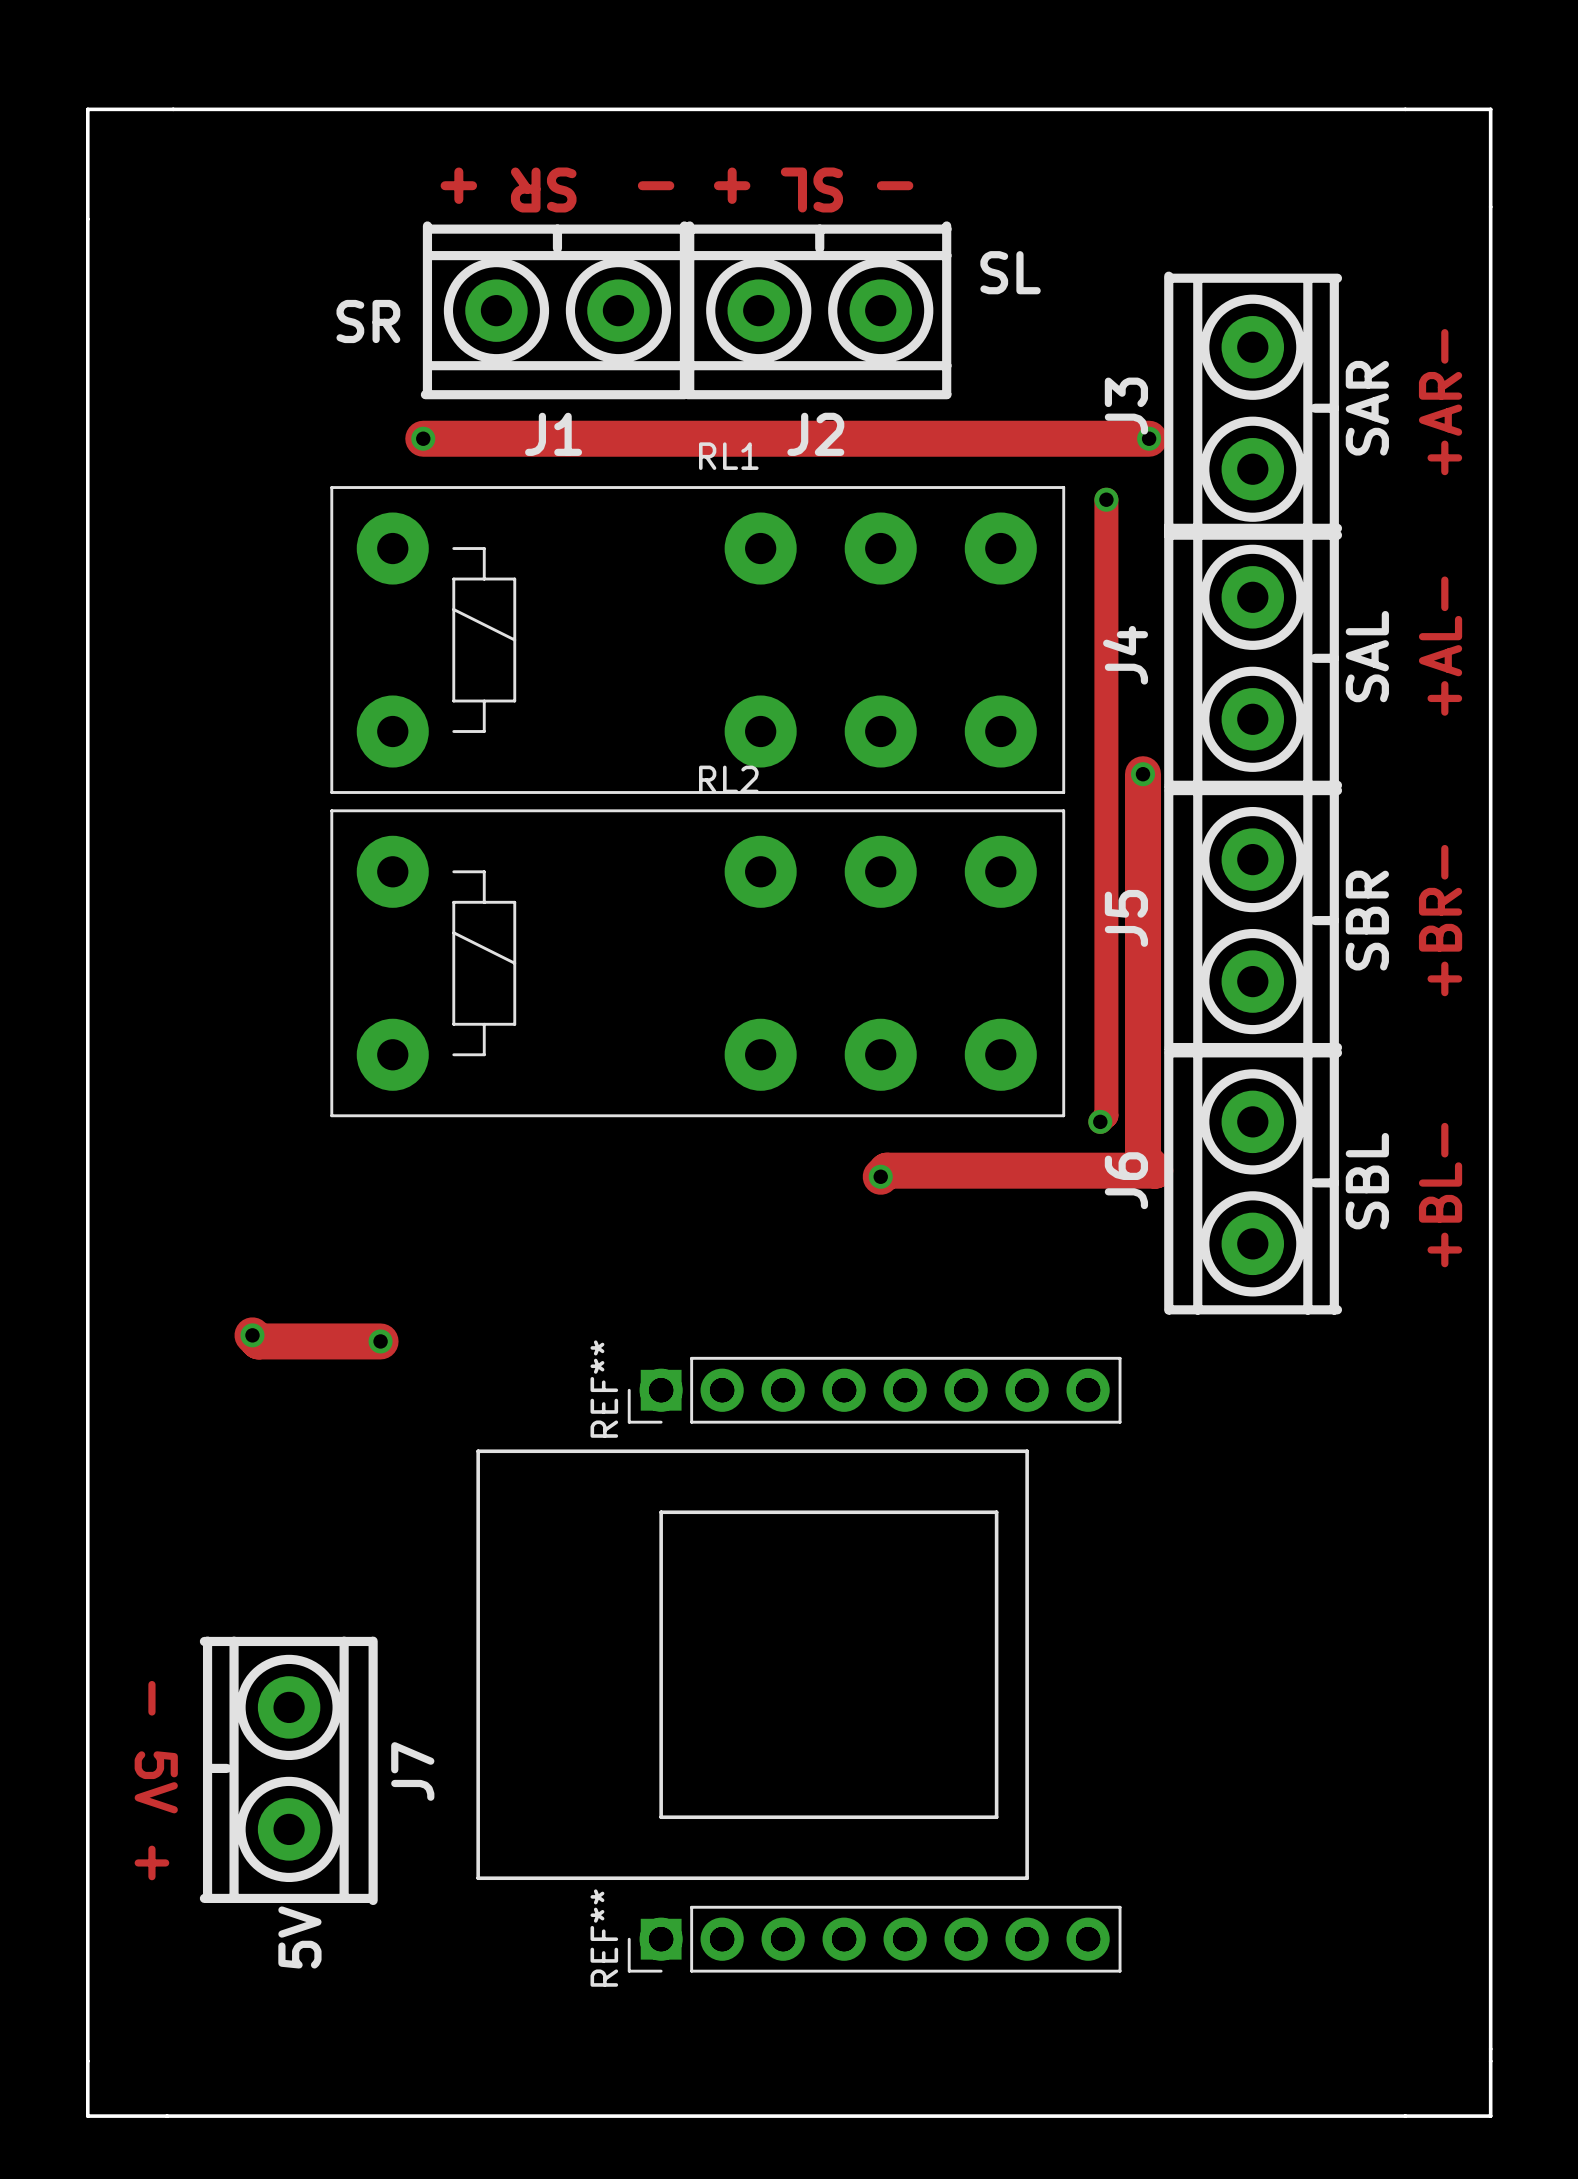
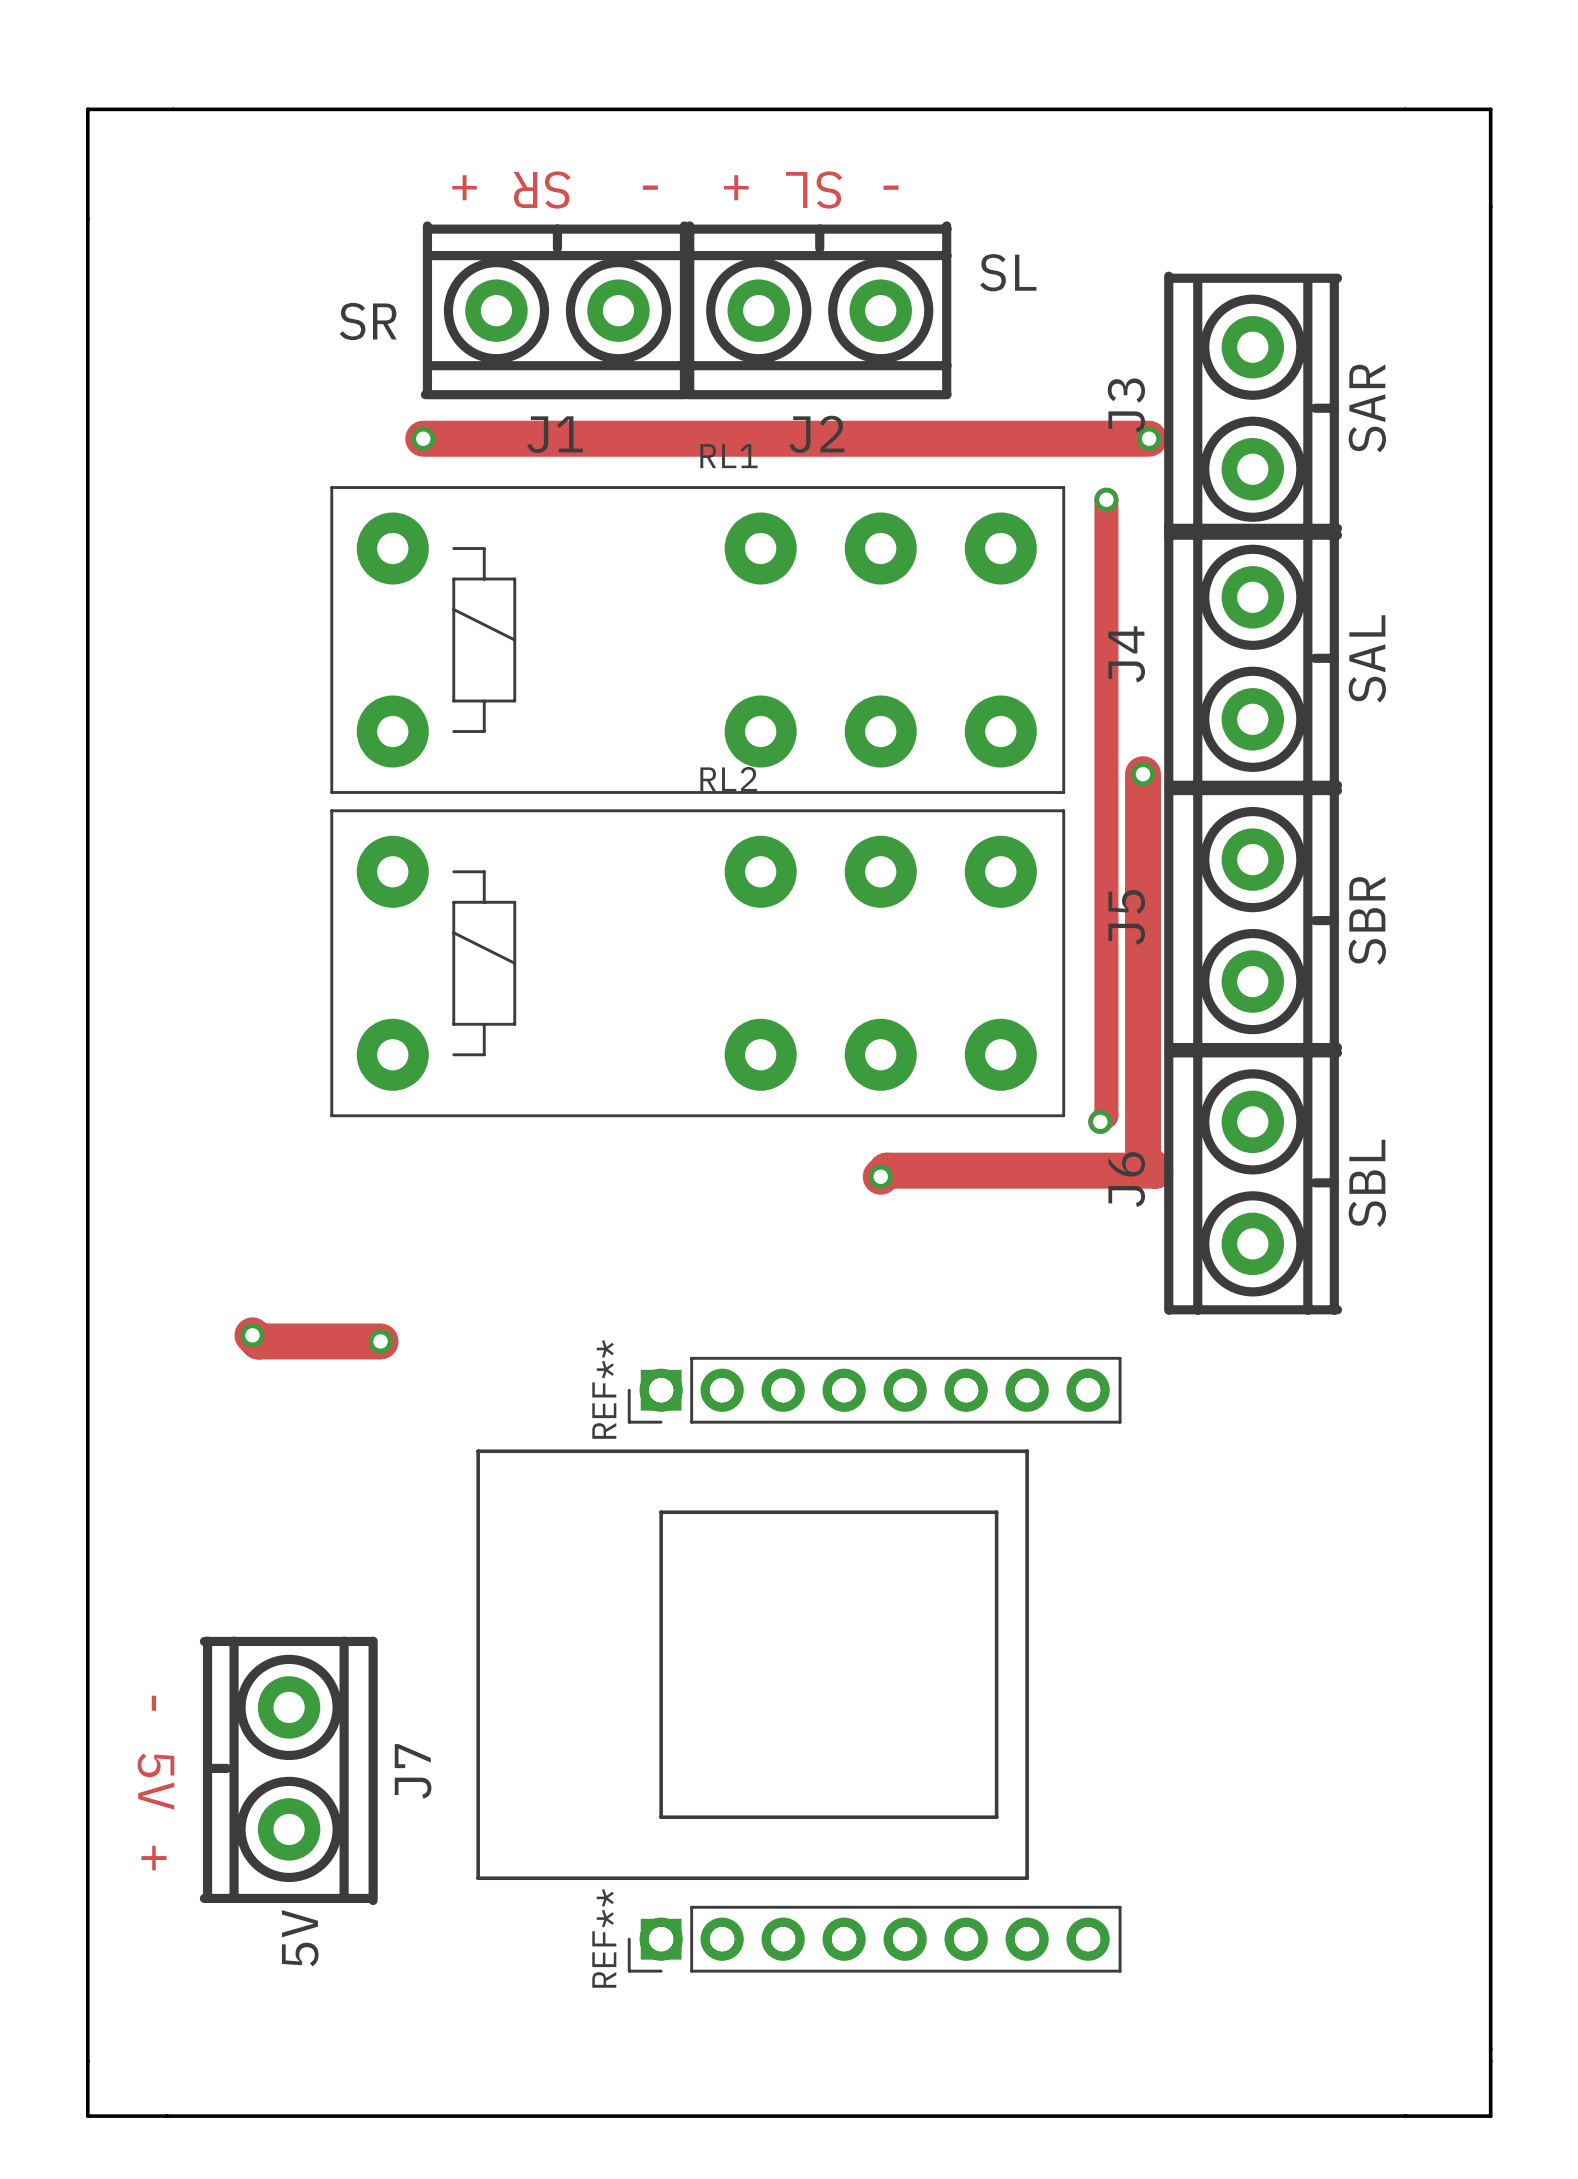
text: +AR- (1440, 402) -> none
text: +AL- (1440, 646) -> none
text: +BR- (1440, 920) -> none
text: +BL- (1440, 1195) -> none

